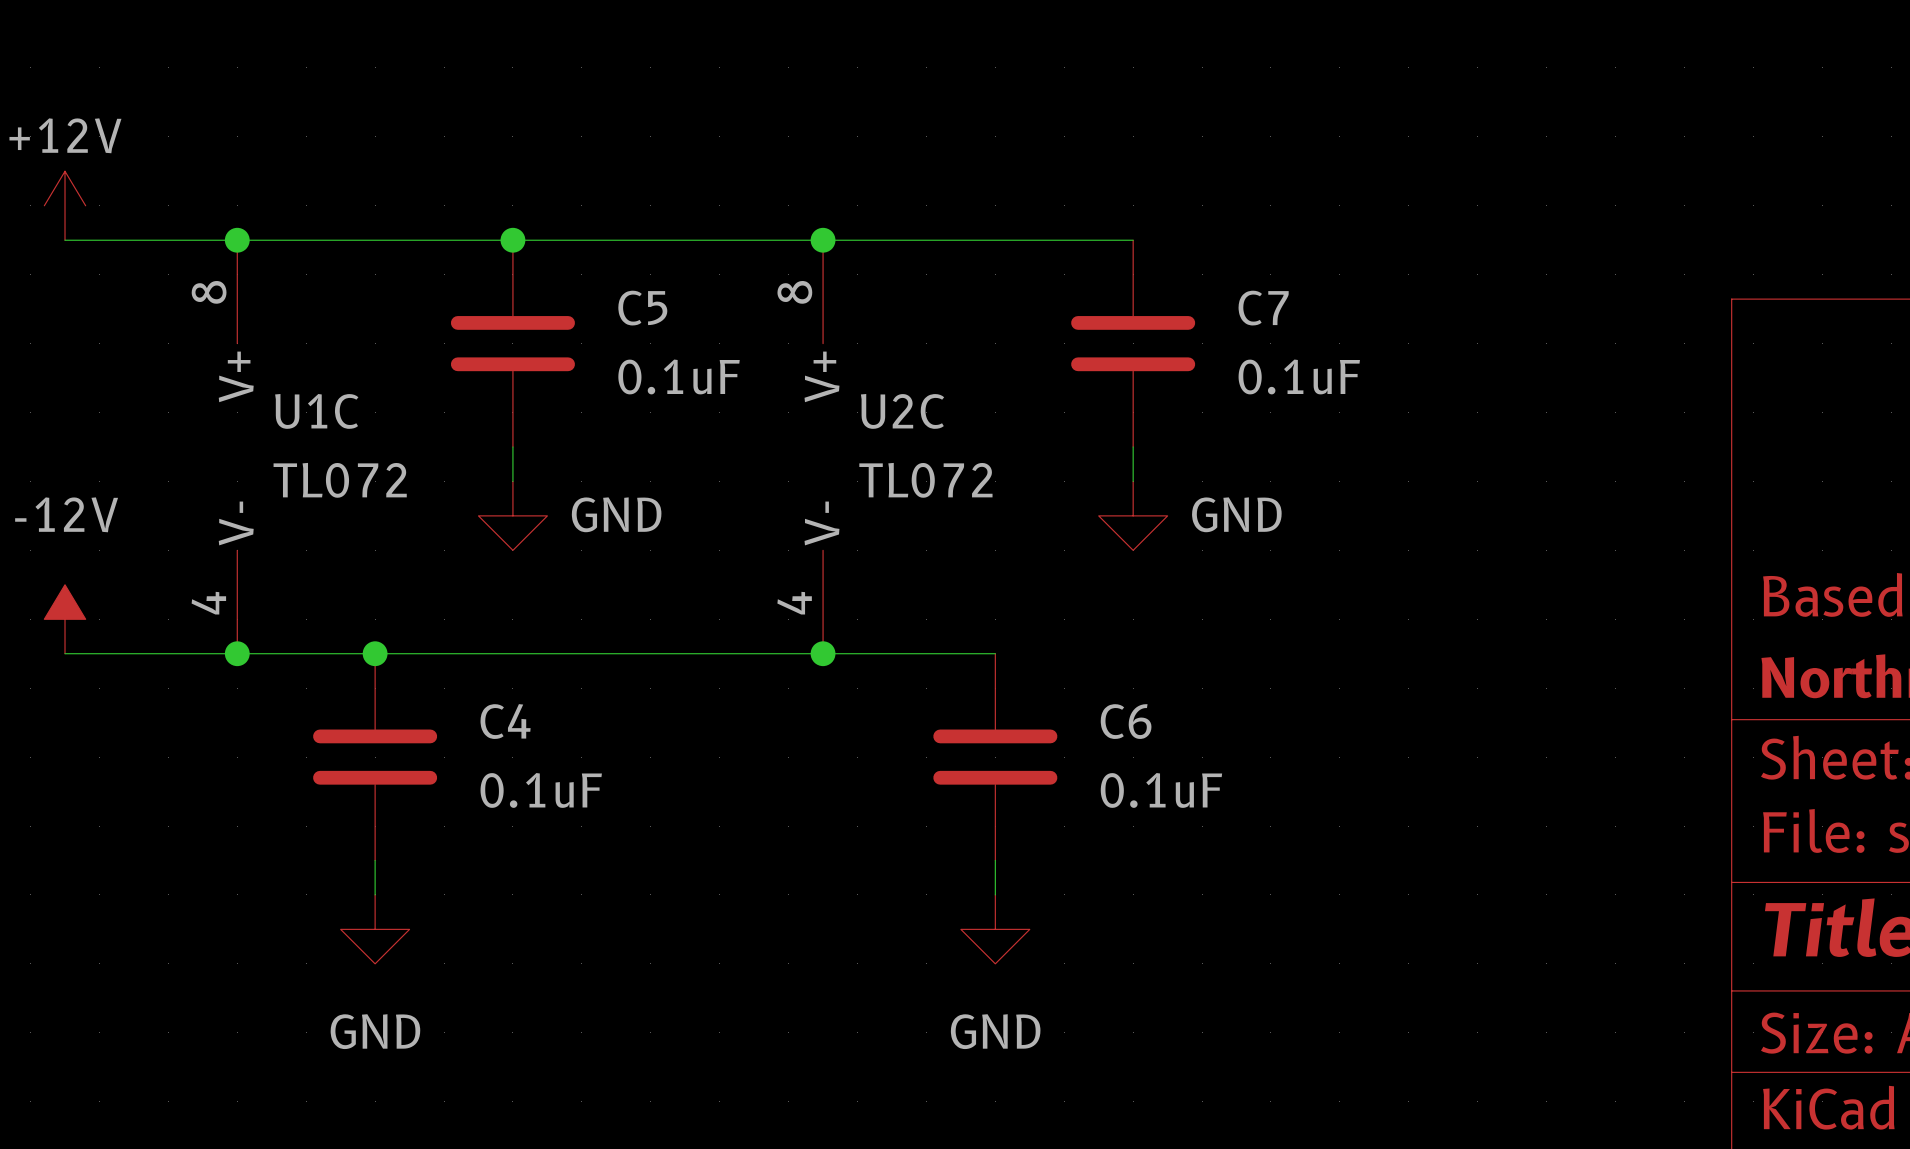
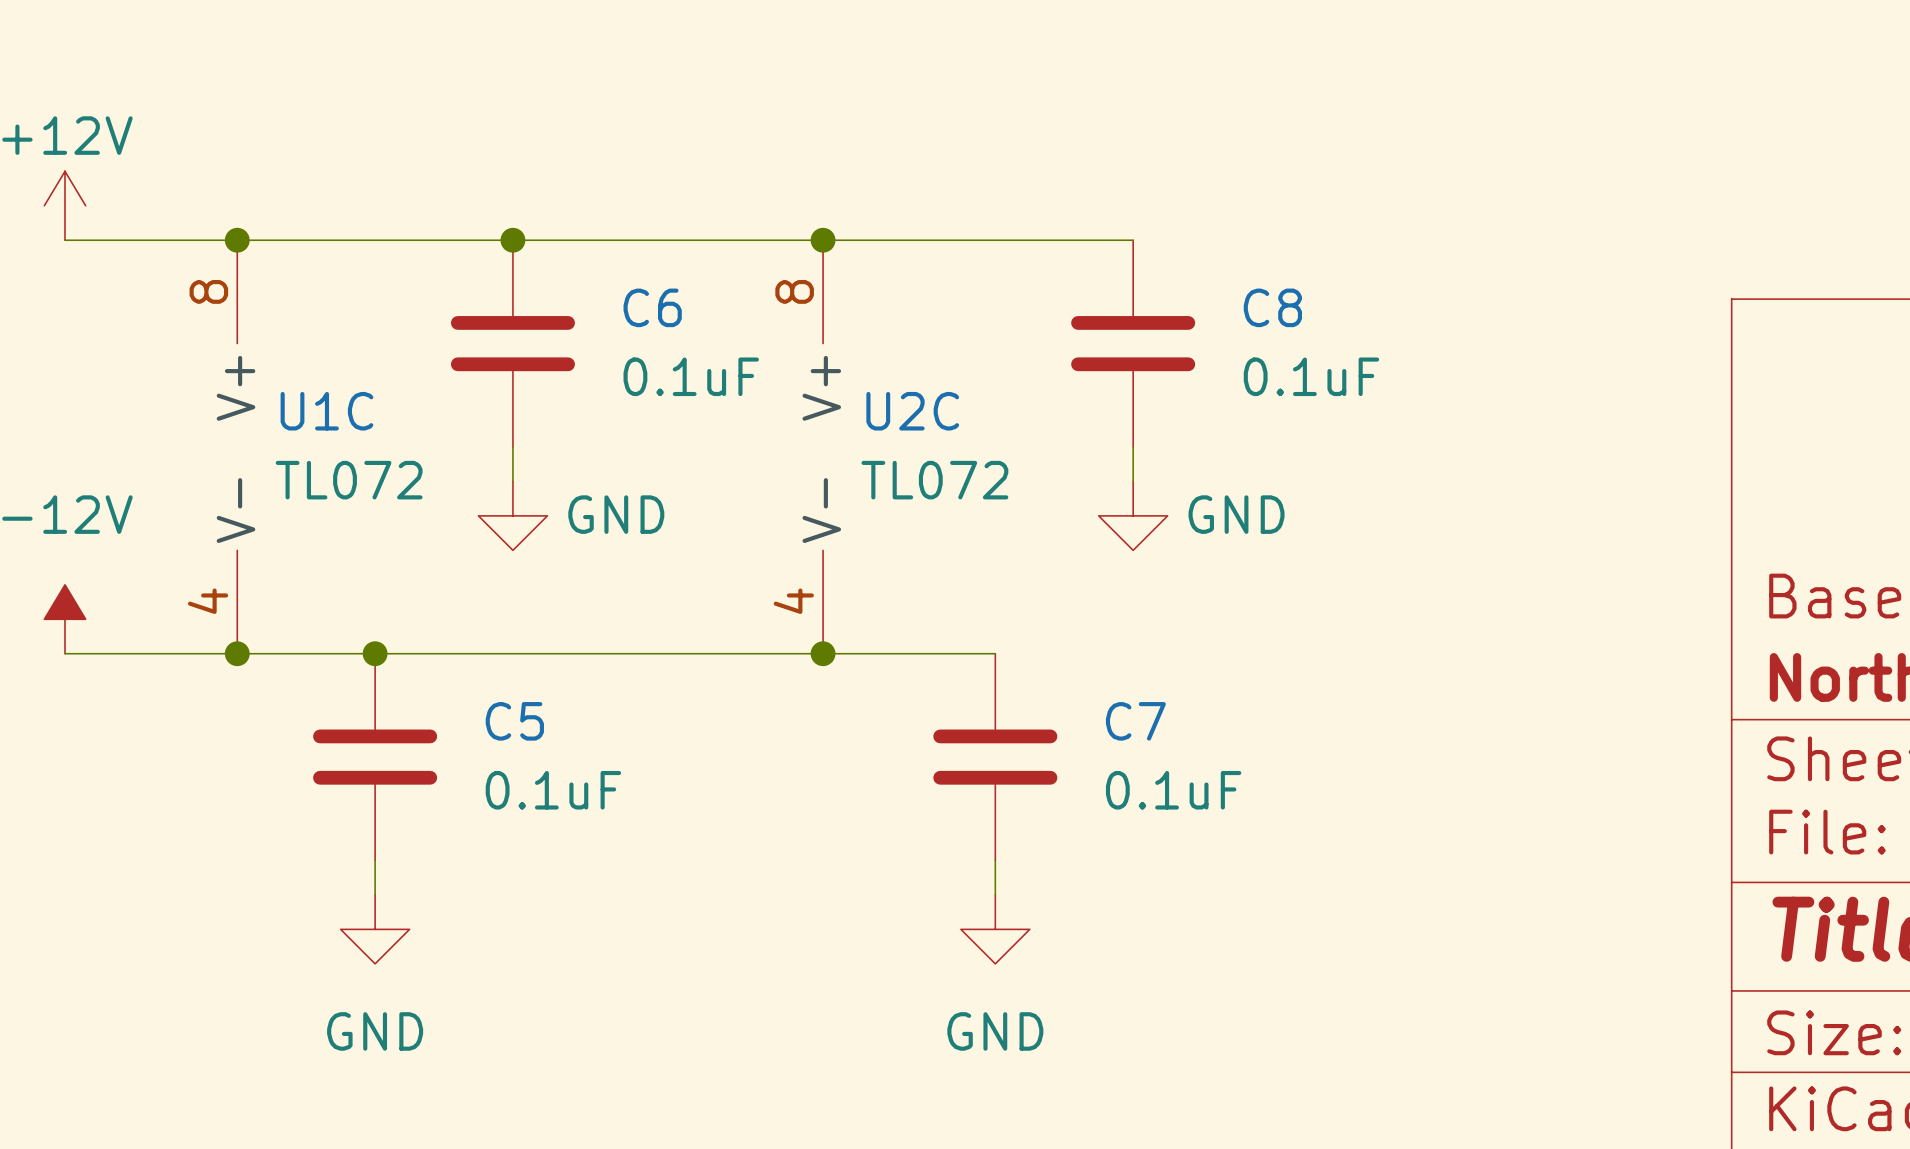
C5 name: C5 (642, 308) -> C6 (652, 307)
C7 name: C7 (1263, 308) -> C8 (1272, 307)
C4 name: C4 (505, 721) -> C5 (514, 721)
C6 name: C6 (1126, 721) -> C7 (1135, 721)

